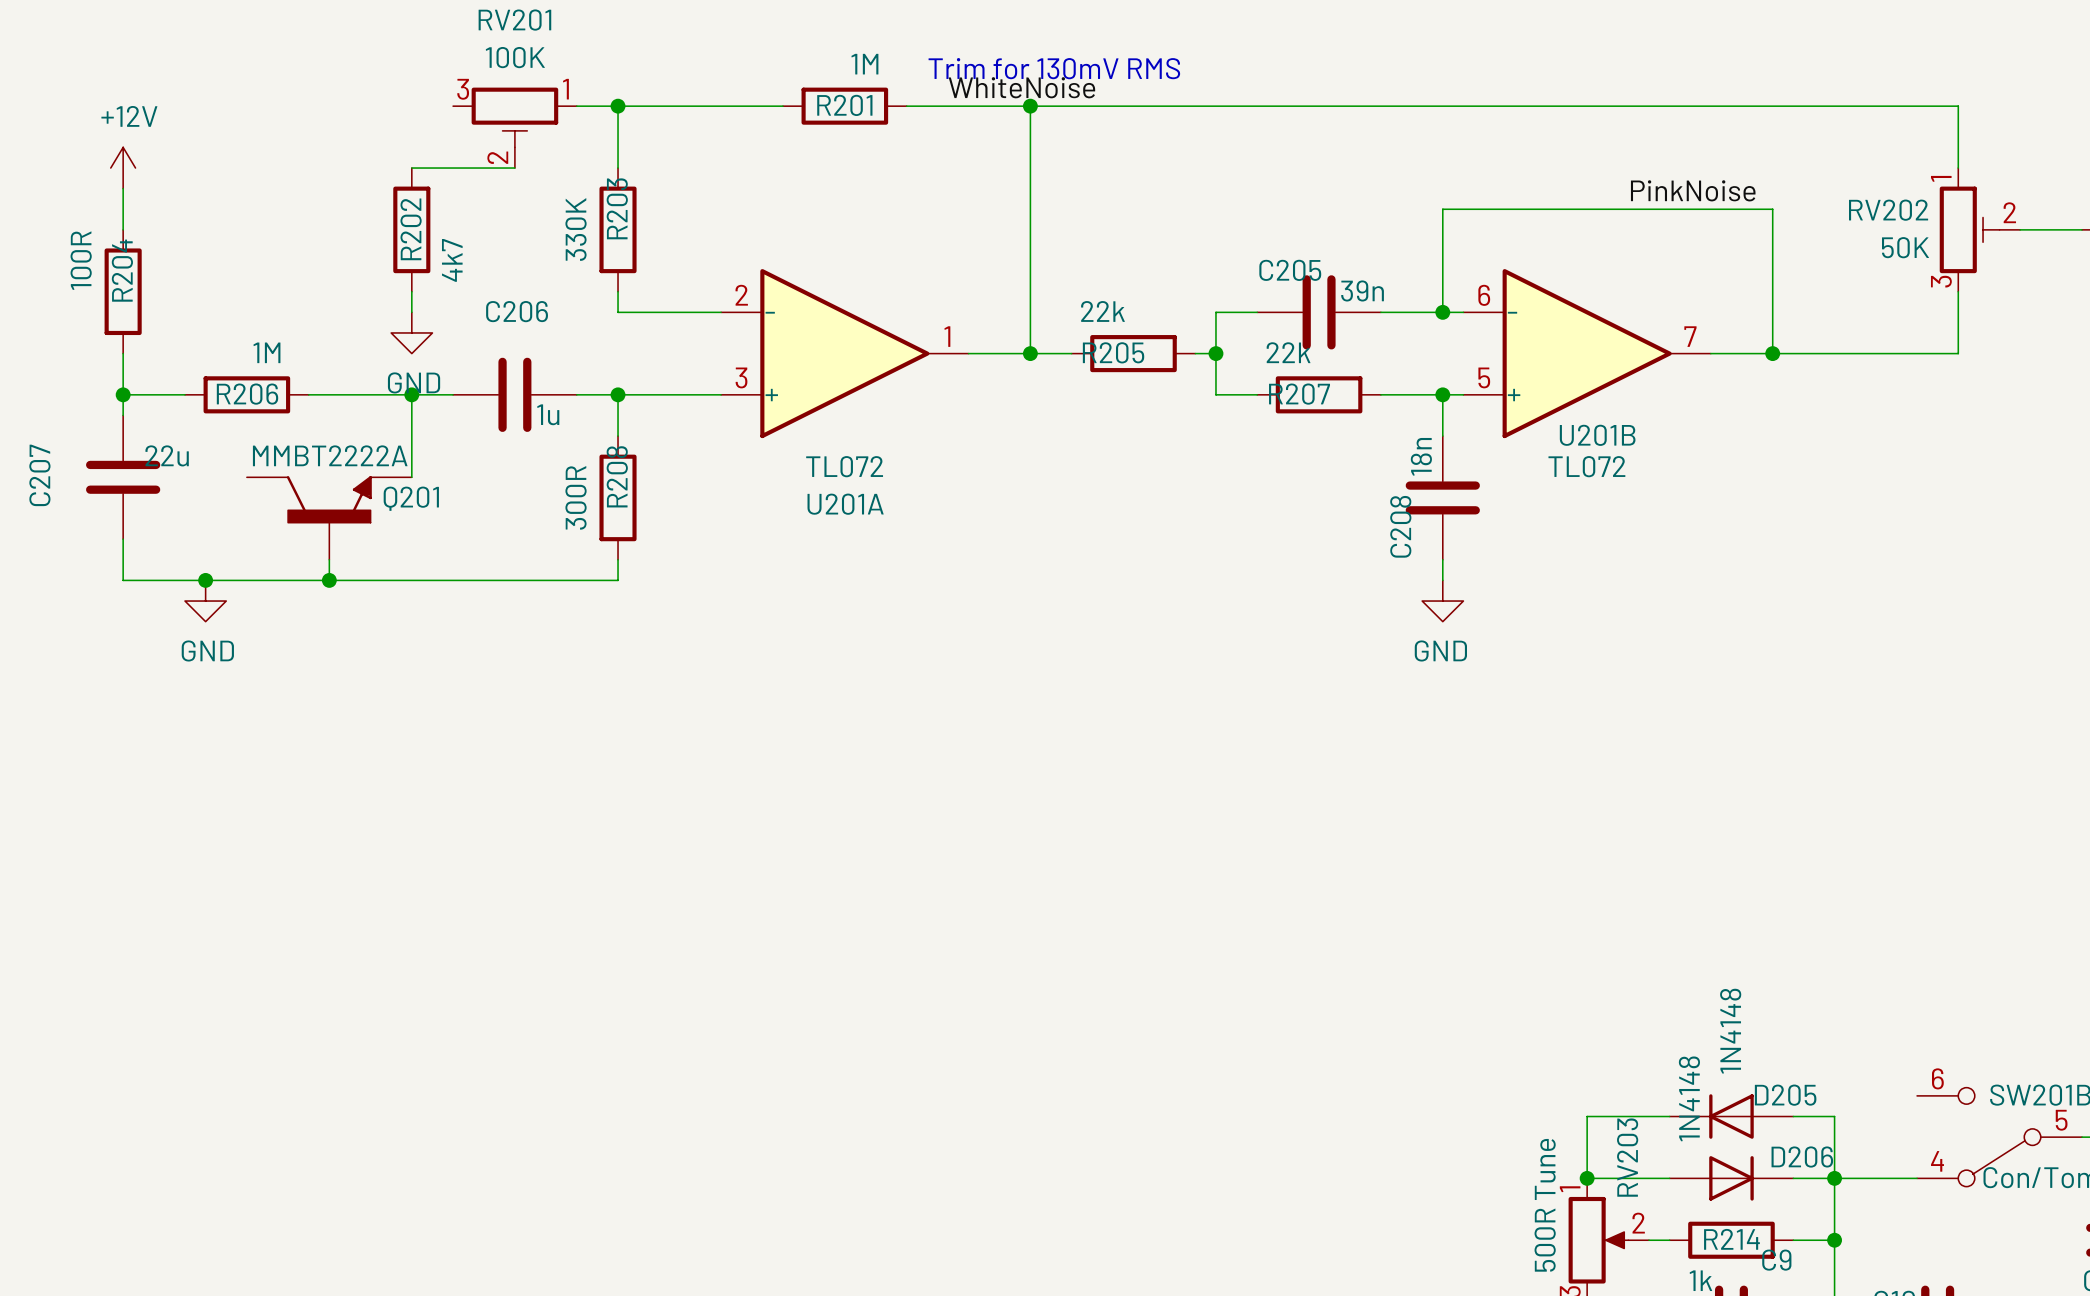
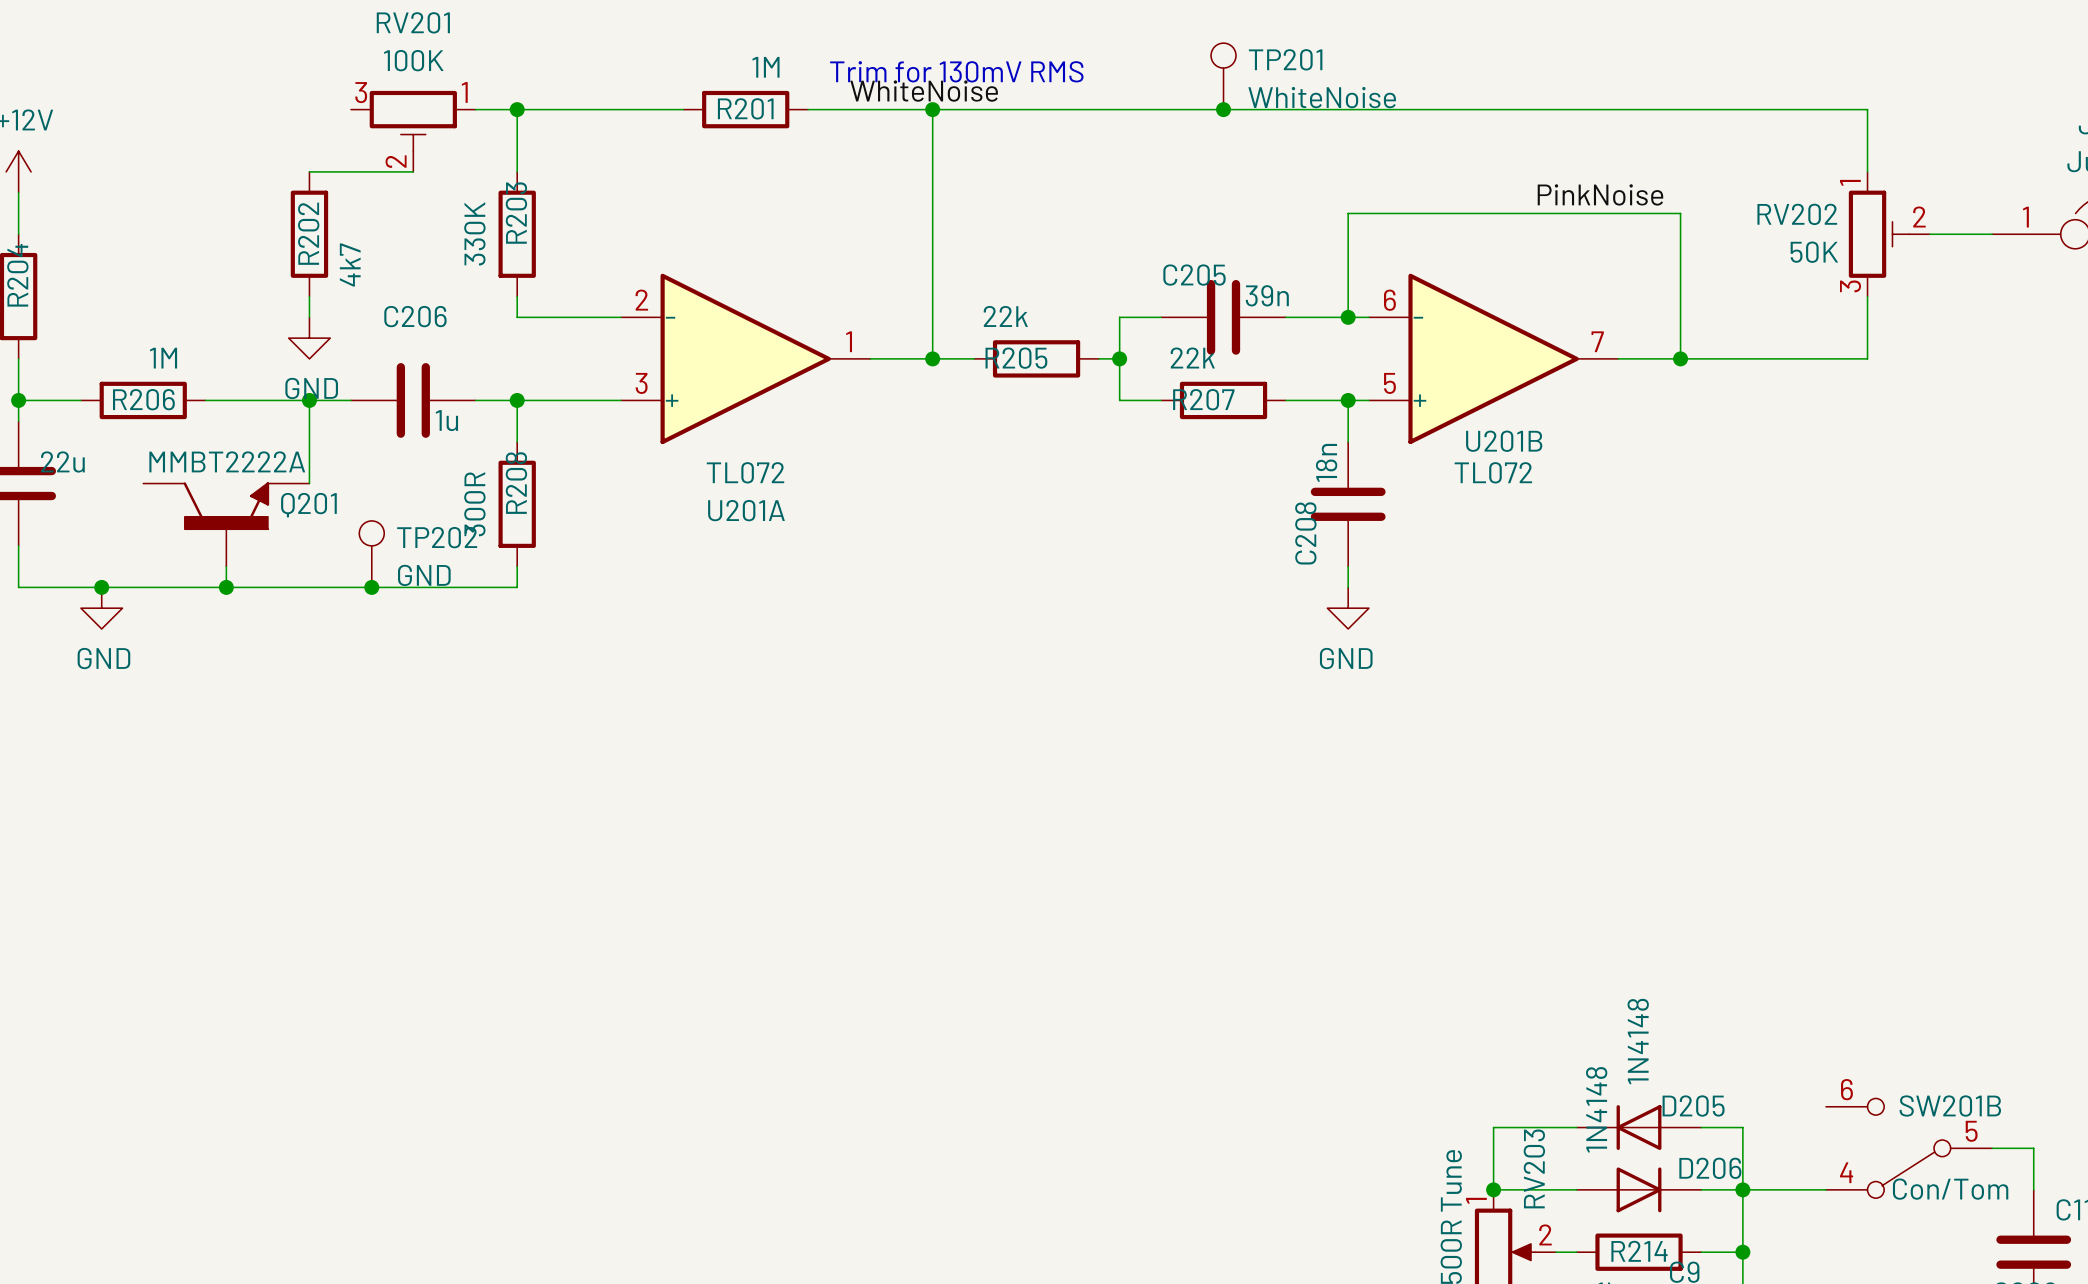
TP201: none -> WhiteNoise (1223, 76)
junction: none -> (1223, 109)
TP202: none -> GND (371, 554)
junction: none -> (371, 587)

